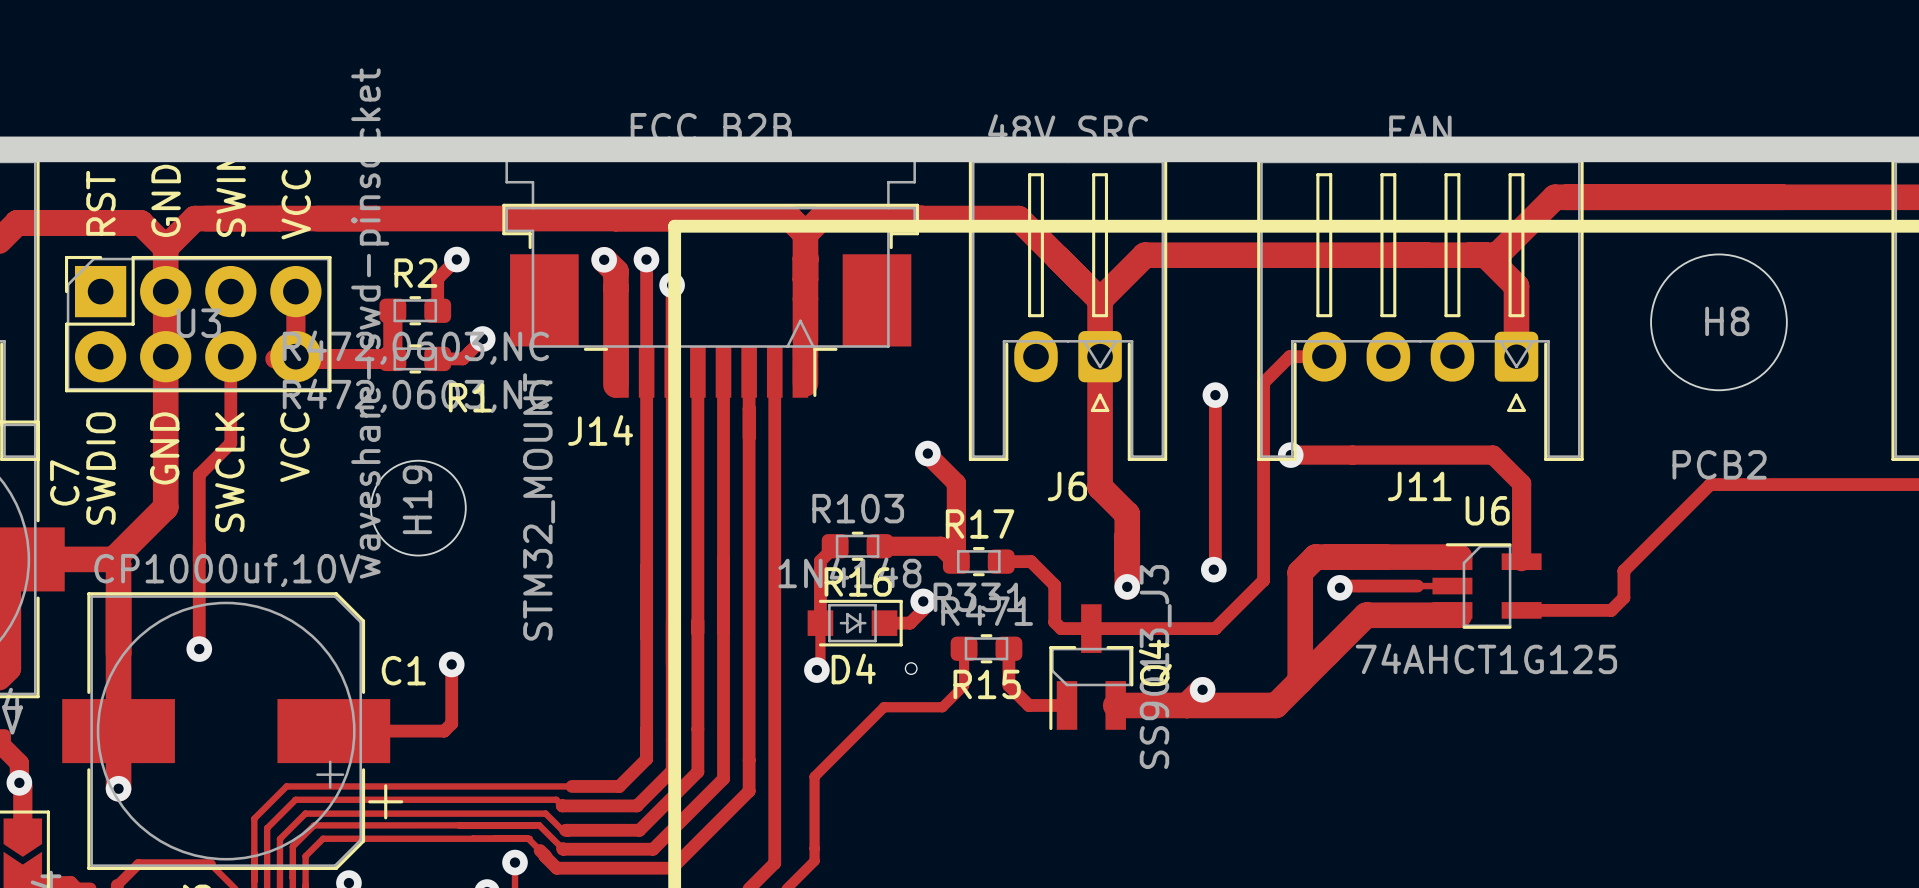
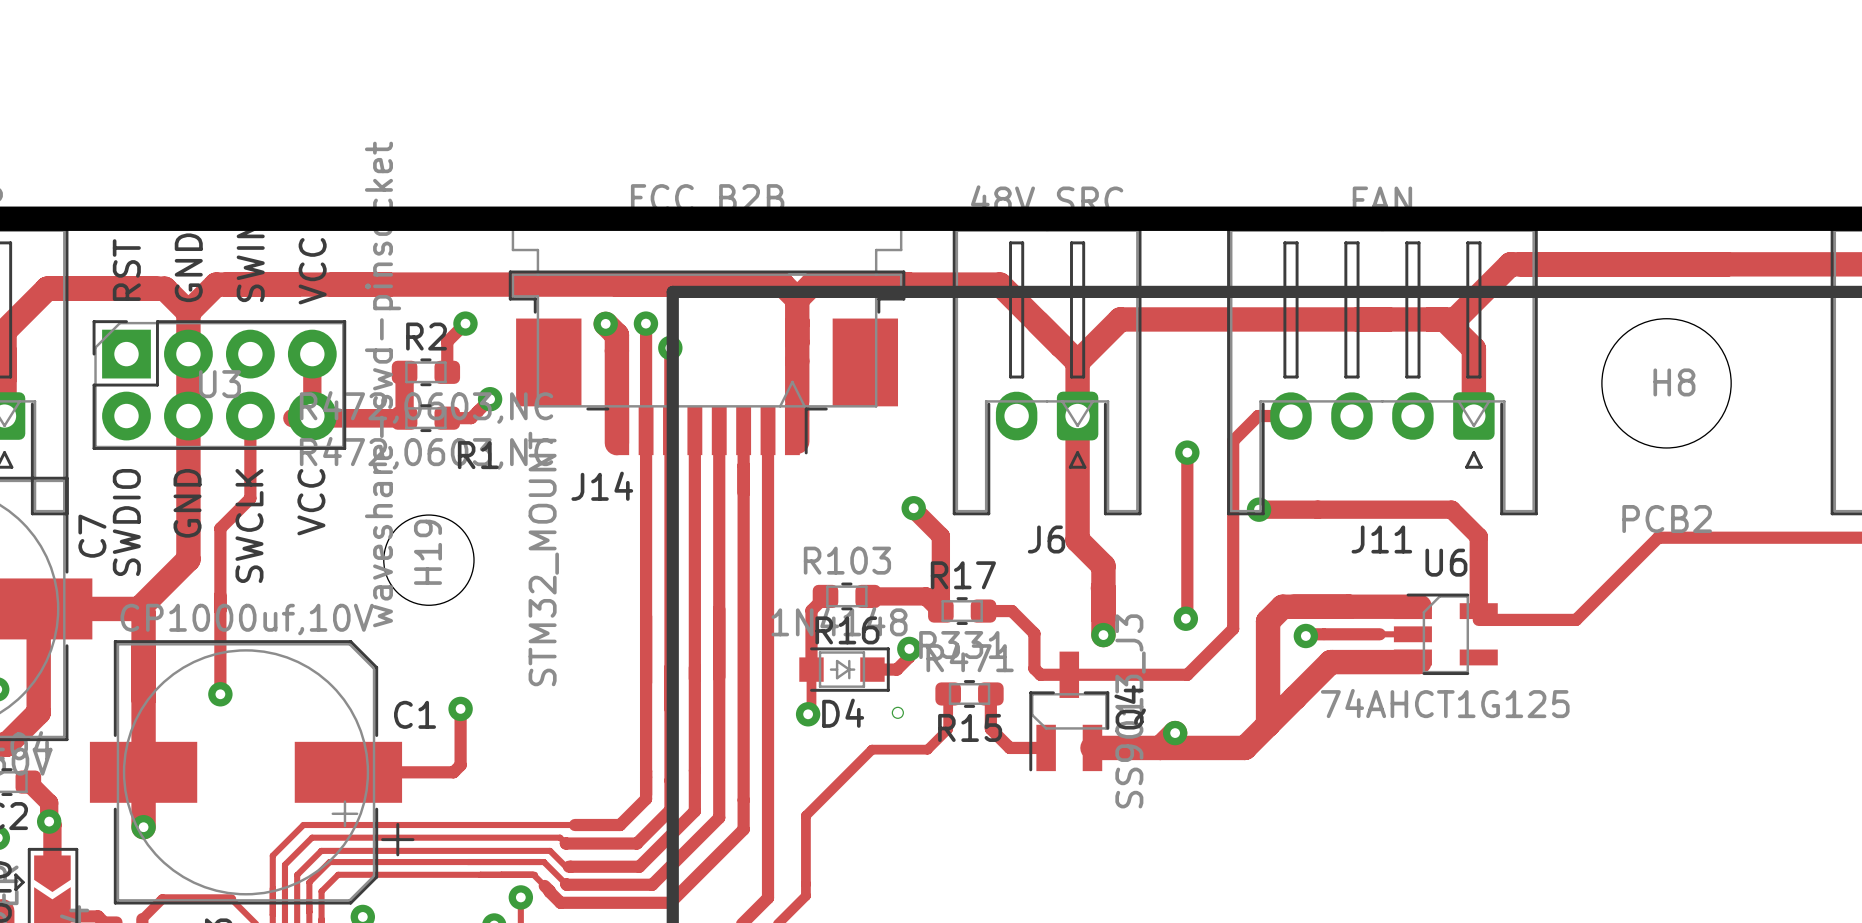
track: (1623, 570) (1623, 597) (1611, 610) (1521, 610) -> (1576, 619) (1478, 619)

